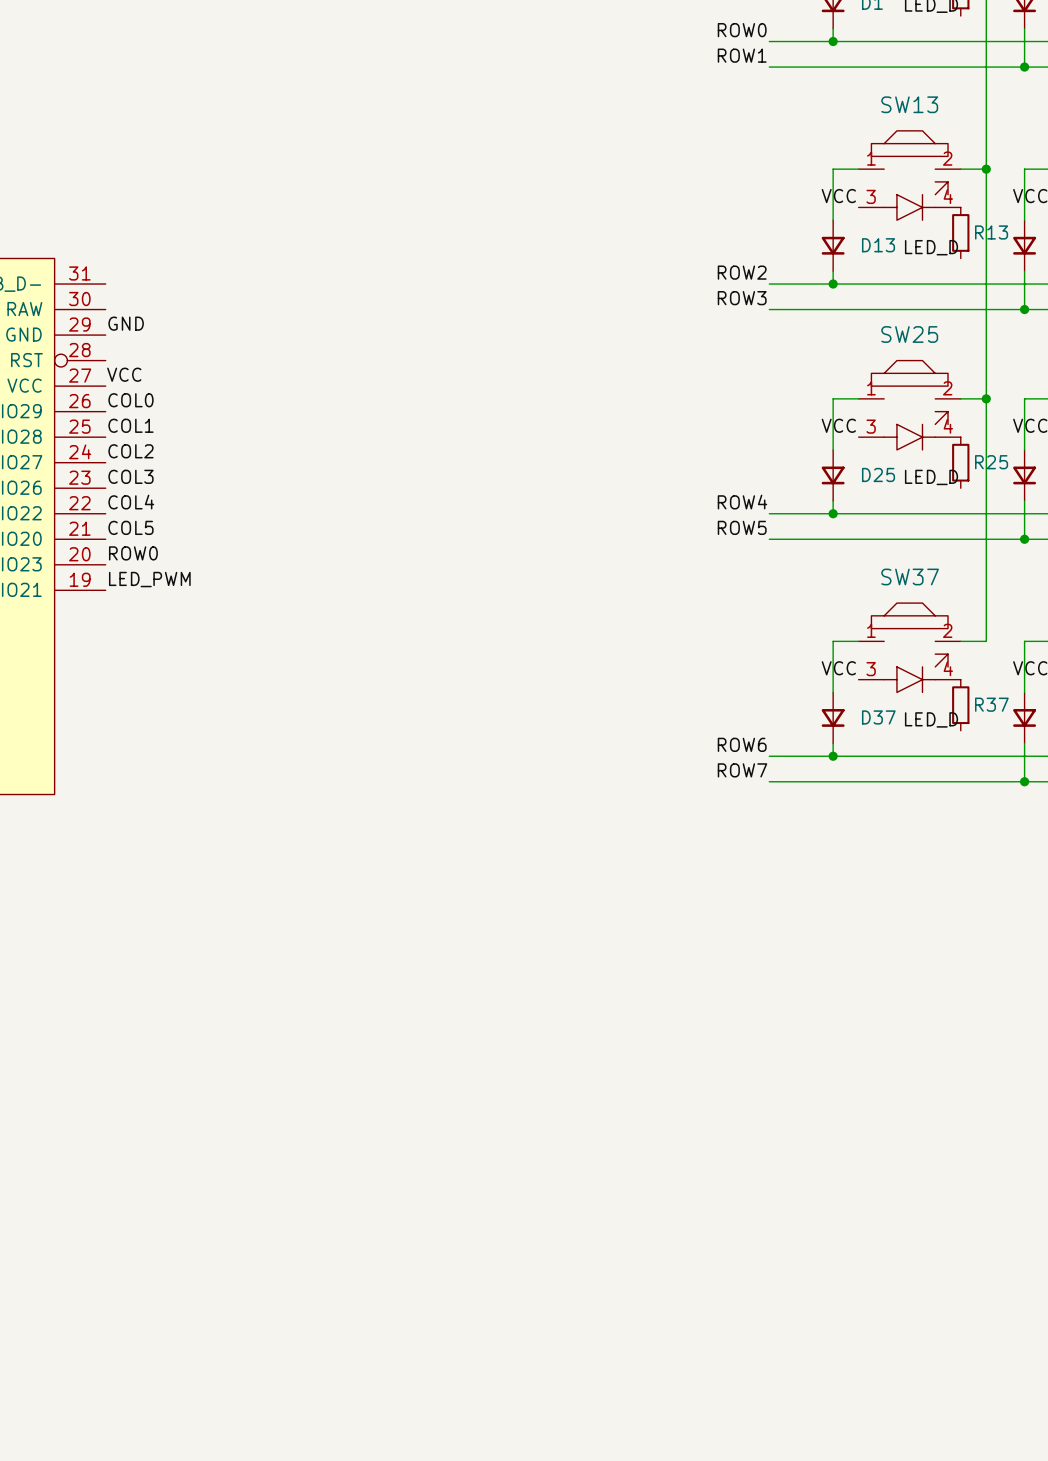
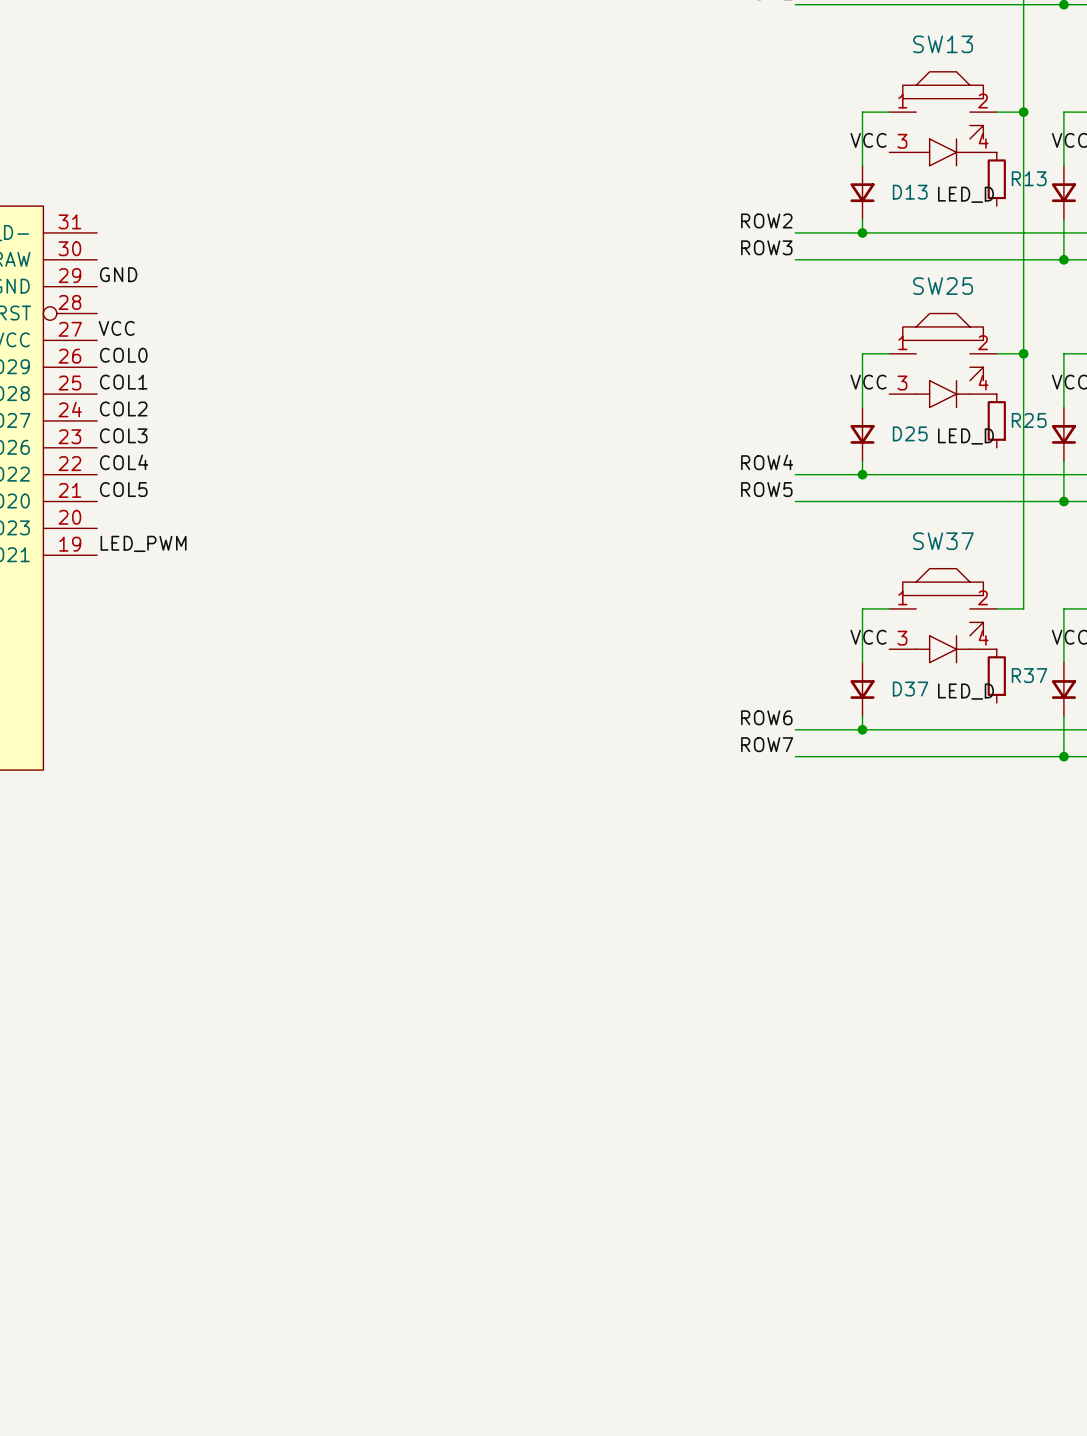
label: ROW0 (133, 553) -> none

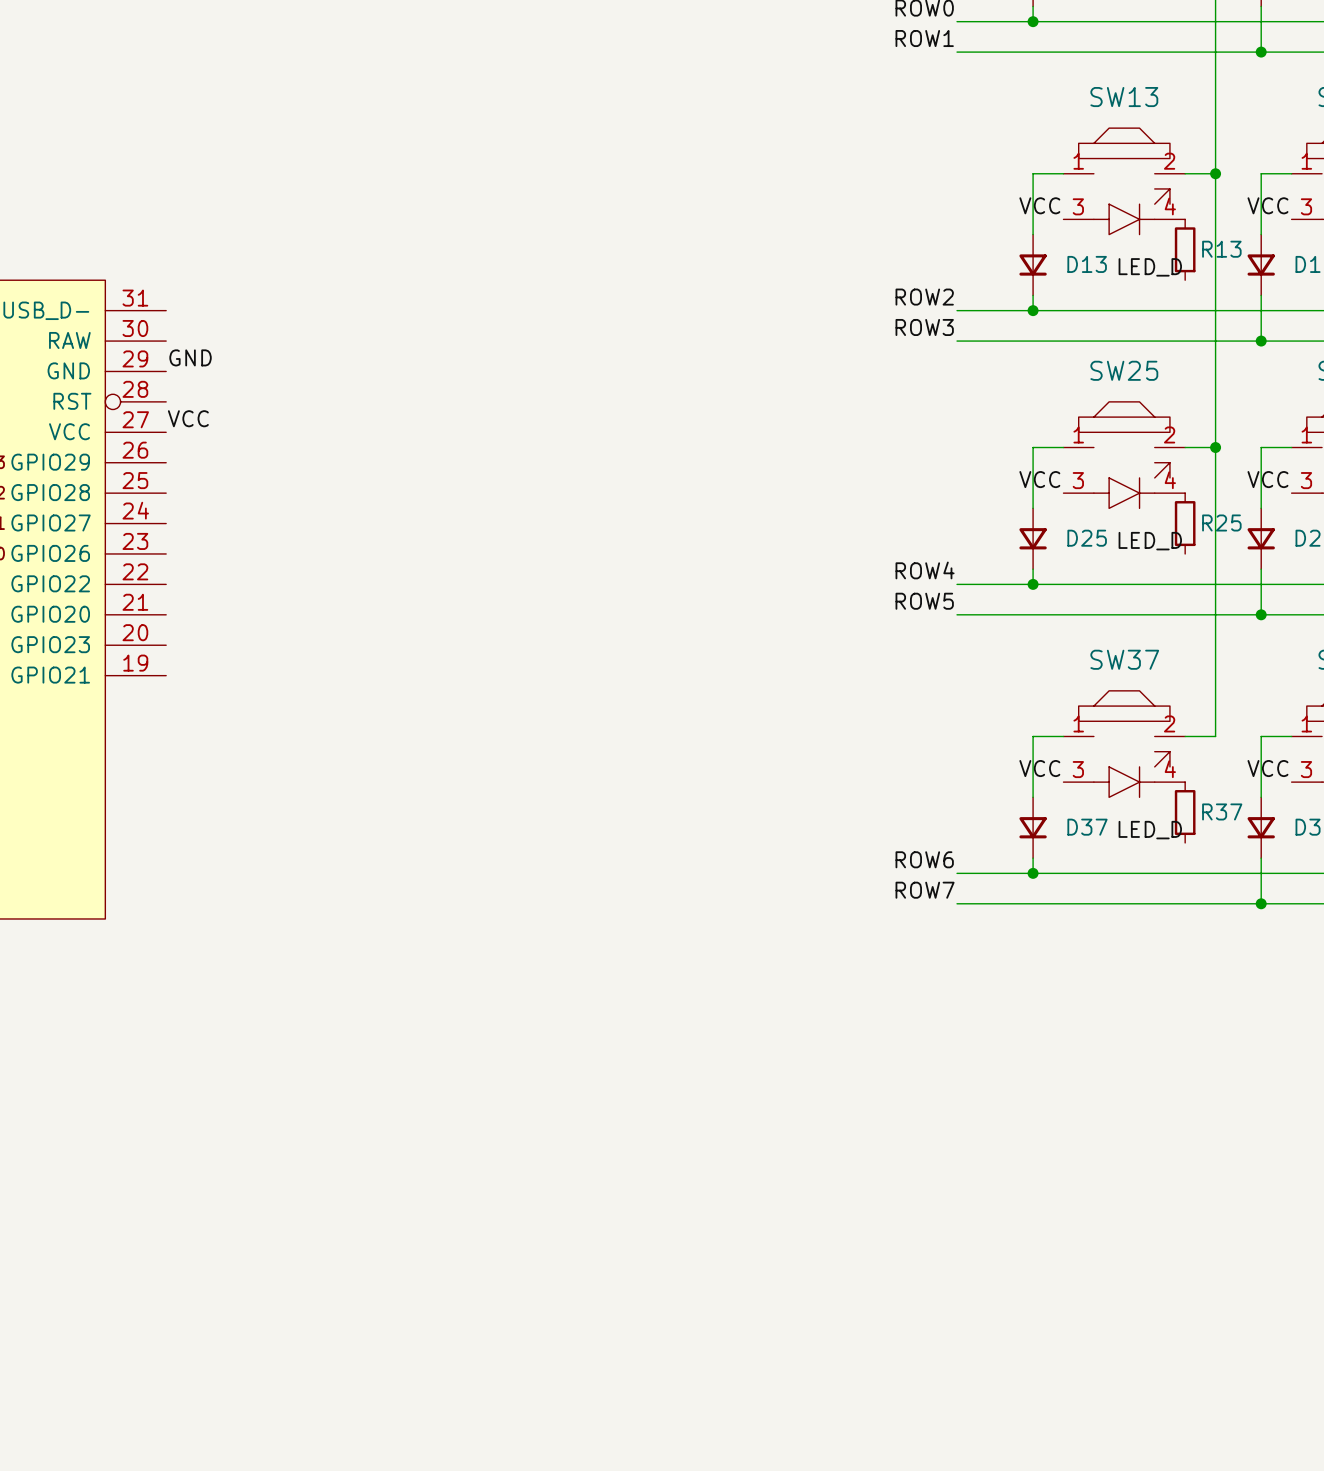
label: COL0 (123, 355) -> none
label: COL1 (123, 382) -> none
label: COL2 (123, 408) -> none
label: COL3 (123, 435) -> none
label: COL4 (124, 462) -> none
label: COL5 (123, 489) -> none
label: LED_PWM (143, 543) -> none

